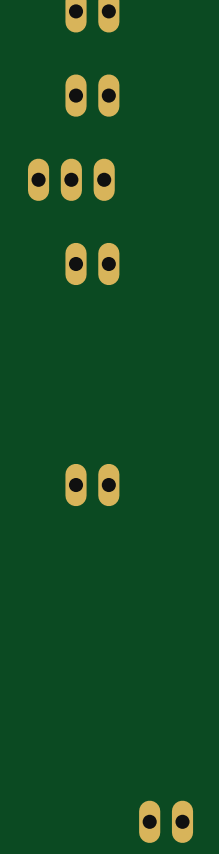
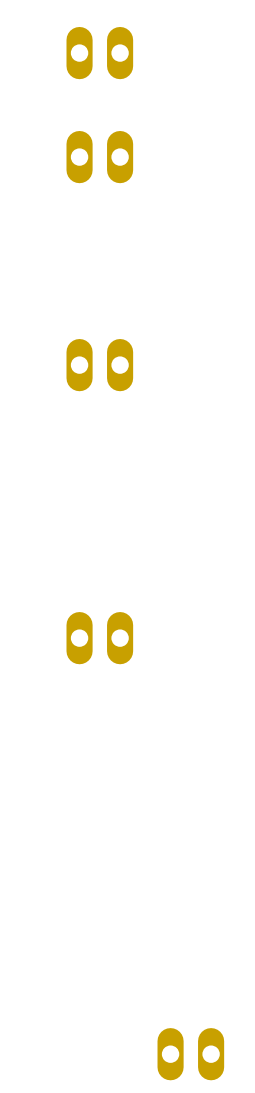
part: (71, 179) -> none

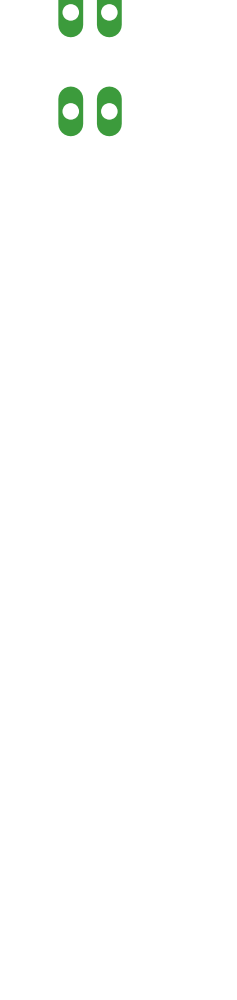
part: (99, 365) -> none
part: (99, 638) -> none
part: (190, 1054) -> none

